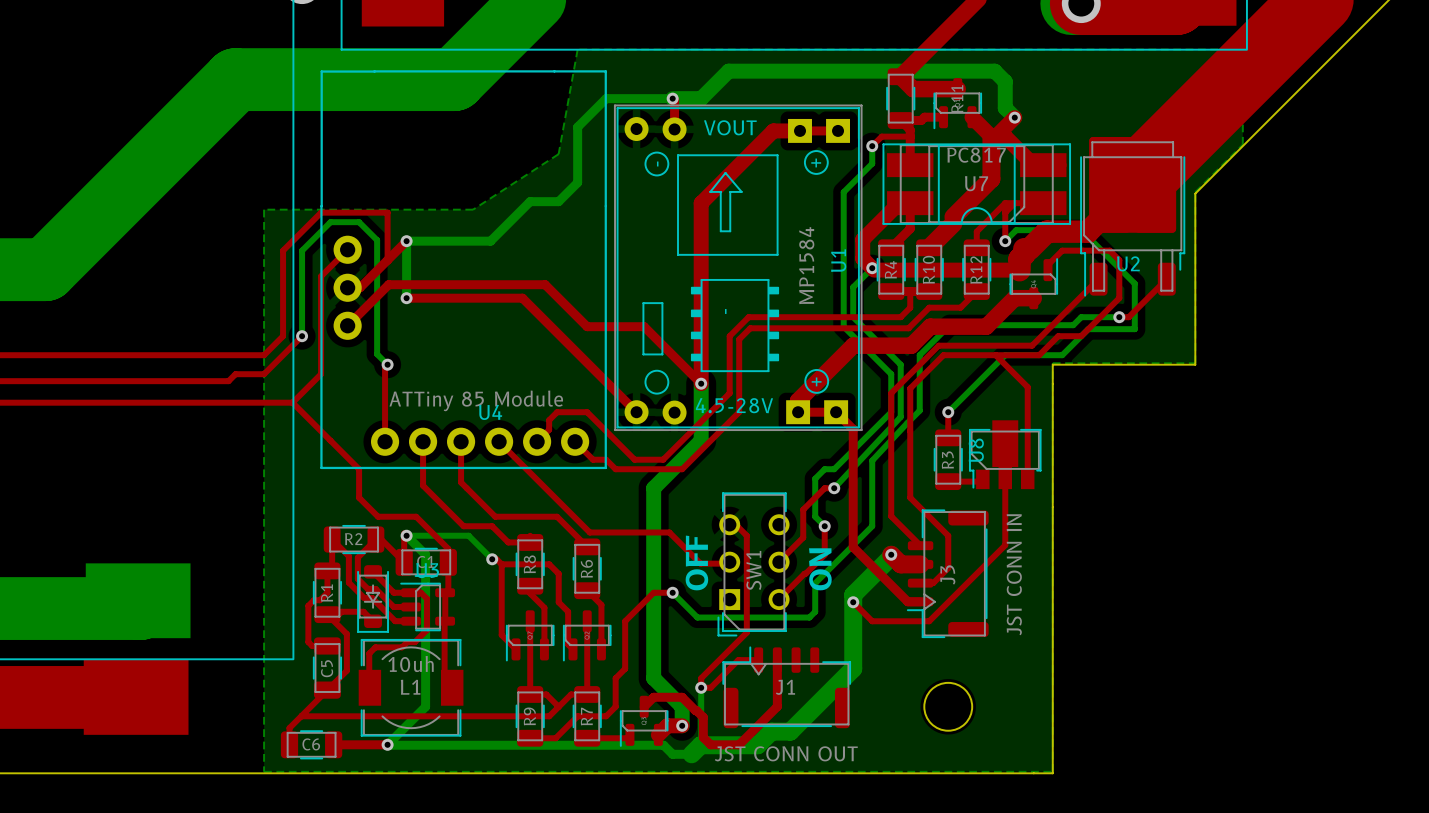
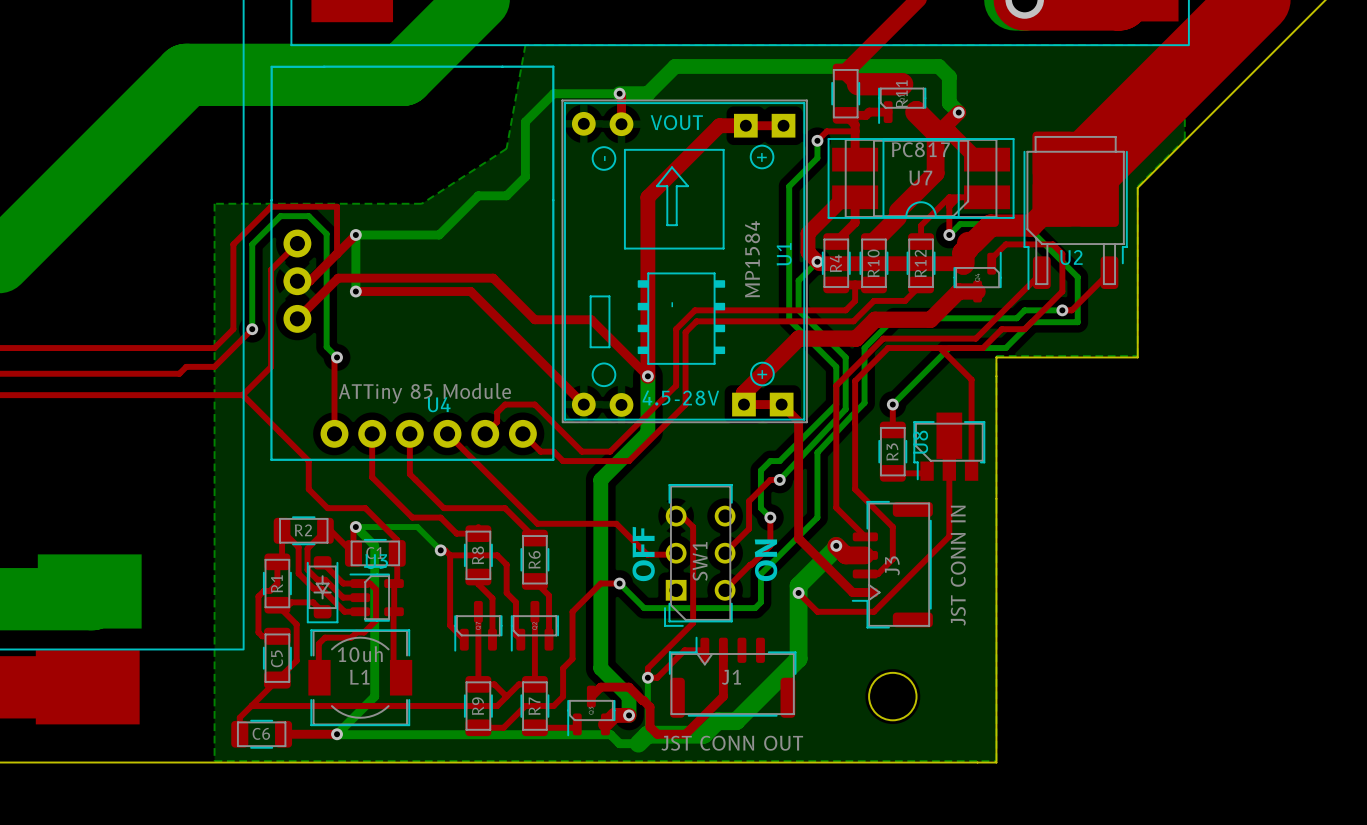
top track width: thin (913, 89) (957, 89) -> thick (857, 84) (902, 84)
top track width: thin (971, 117) (991, 136) -> thick (916, 112) (935, 131)

